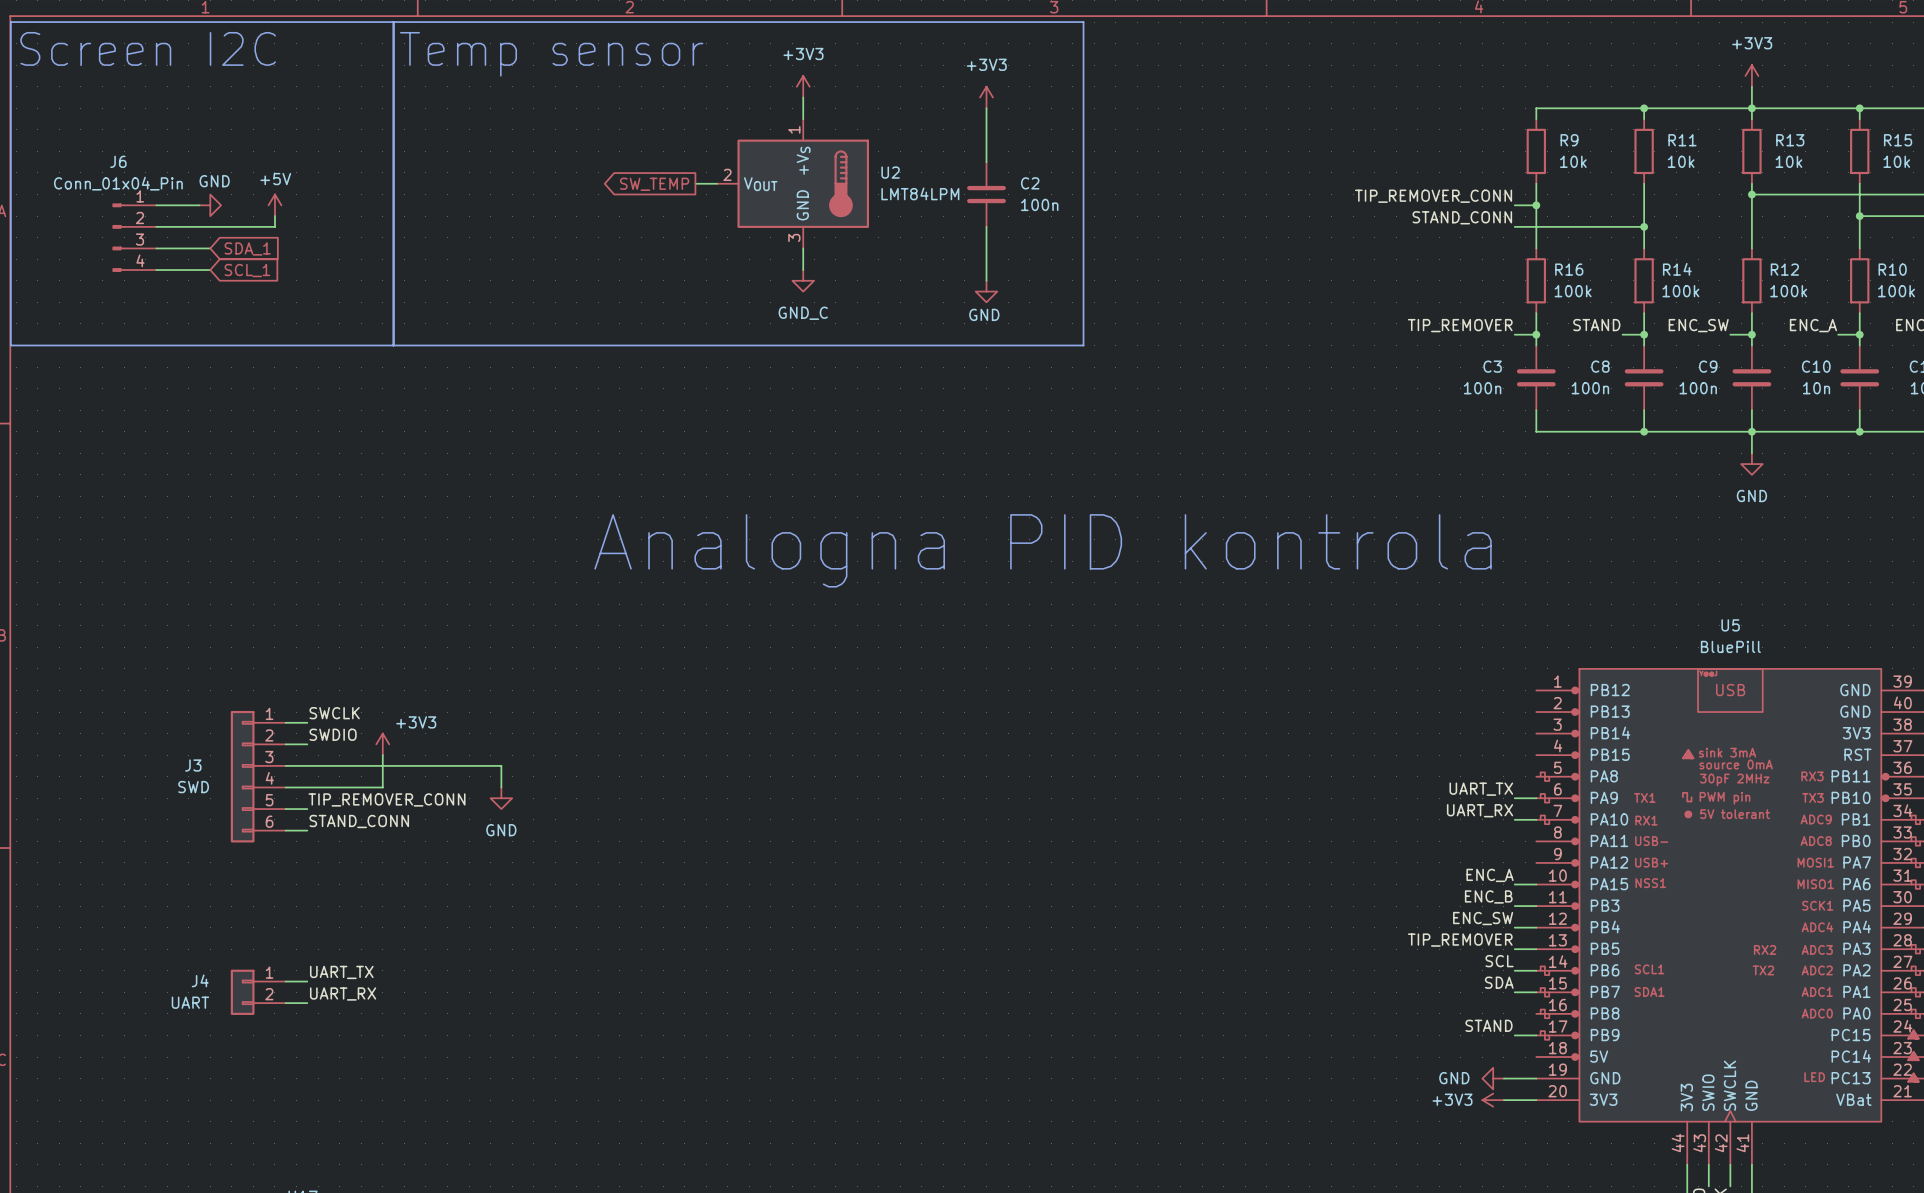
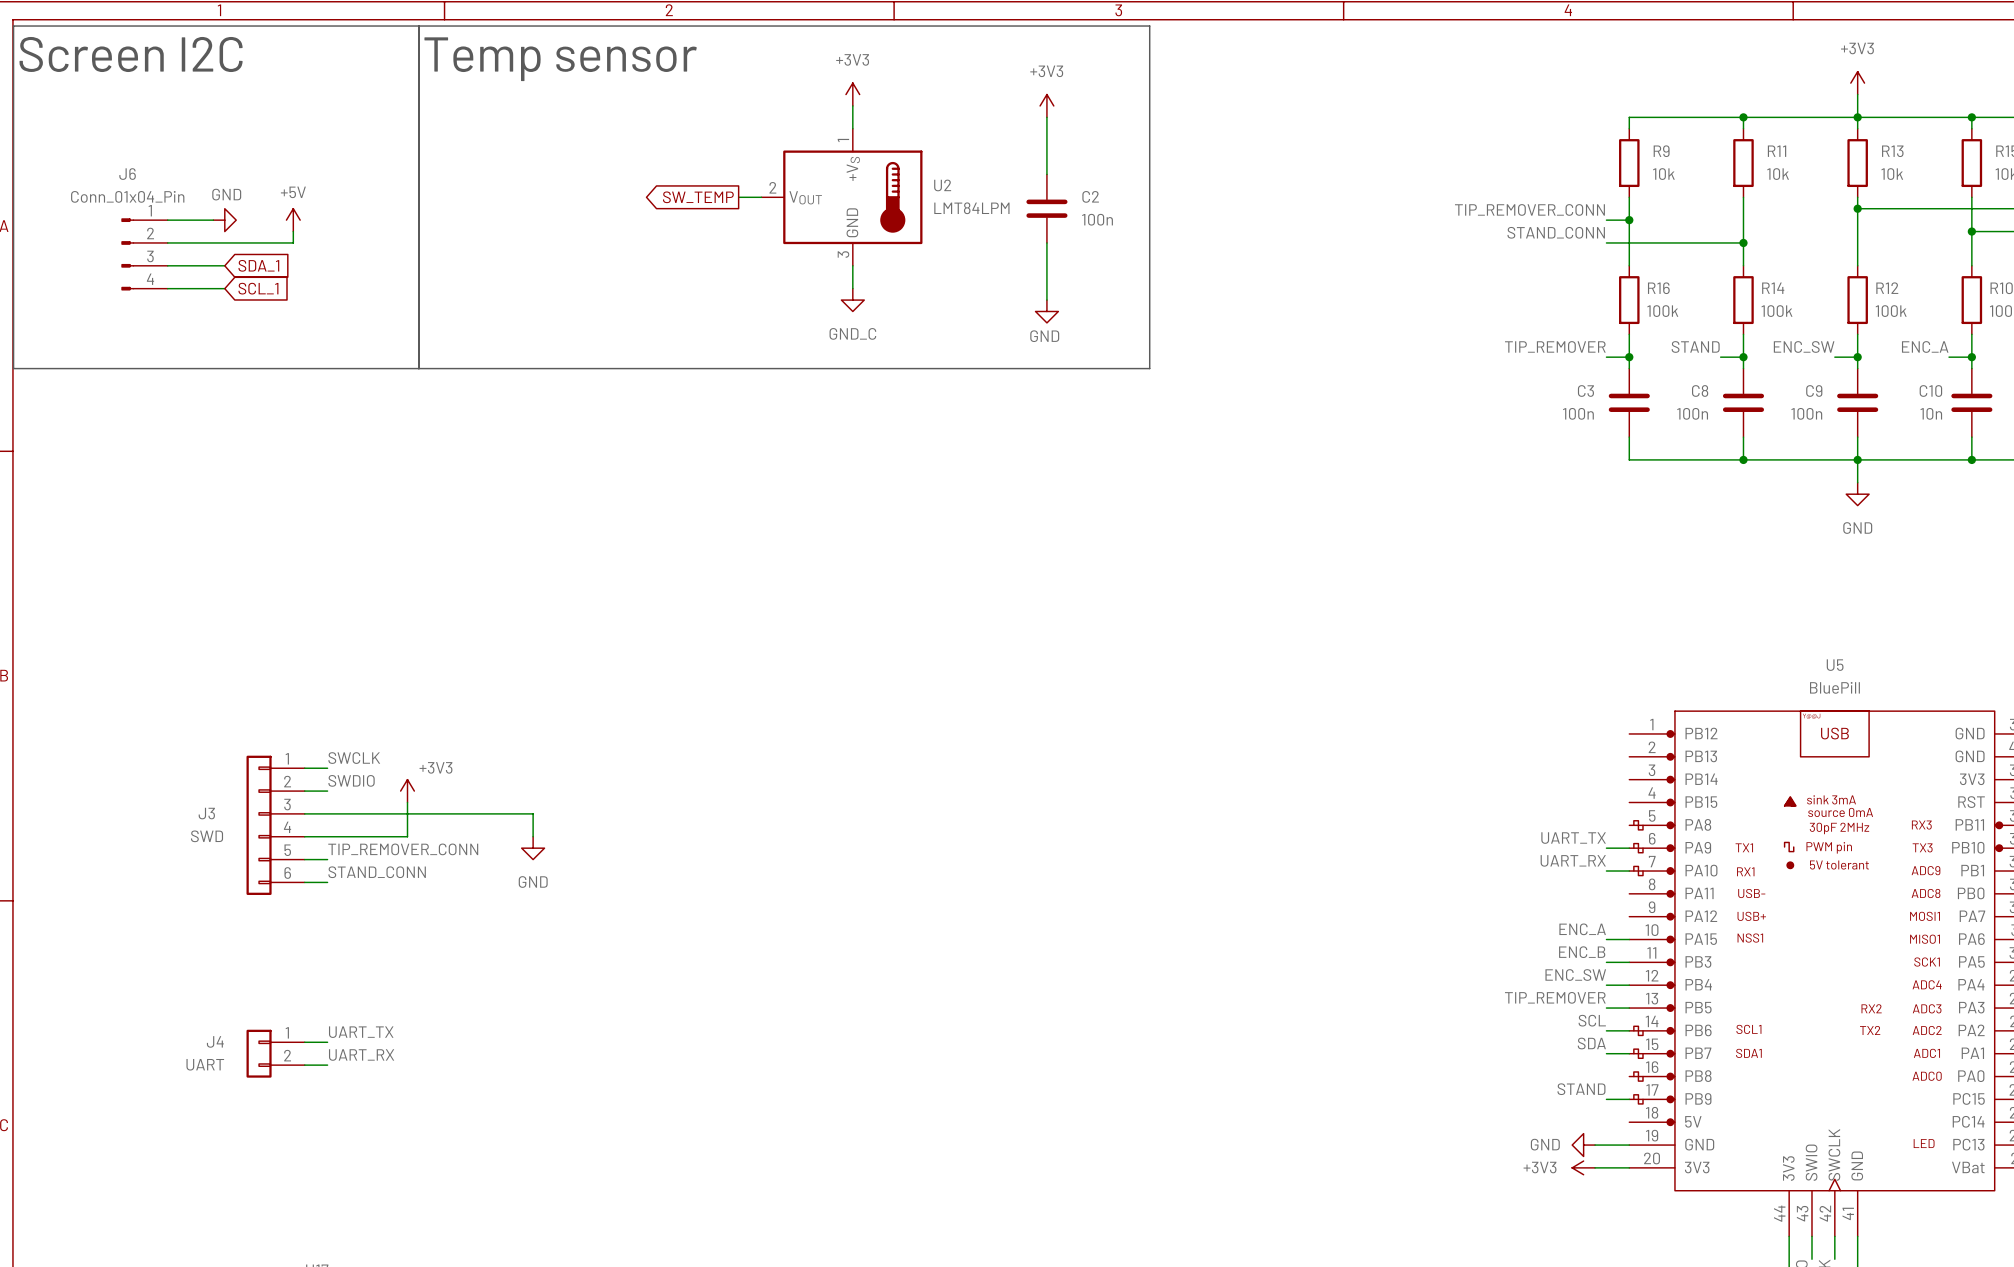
text: Analogna PID kontrola (1043, 550) -> none

